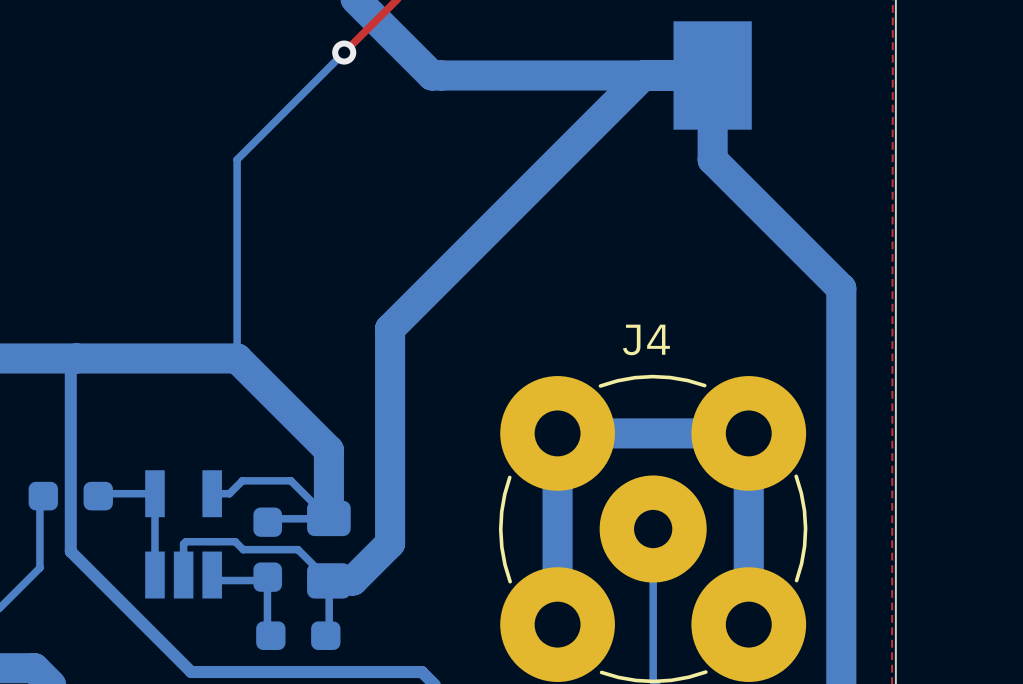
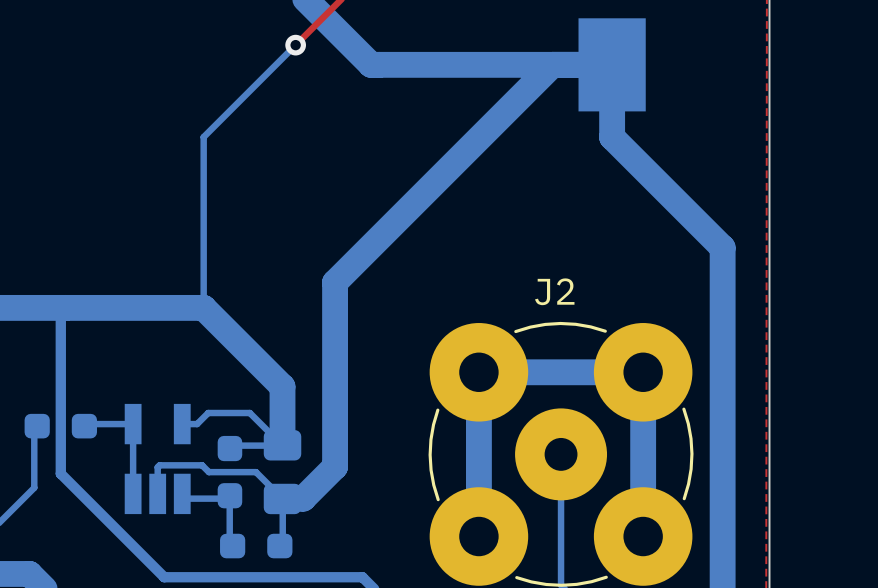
J4 name: J4 (646, 339) -> J2 (554, 291)

